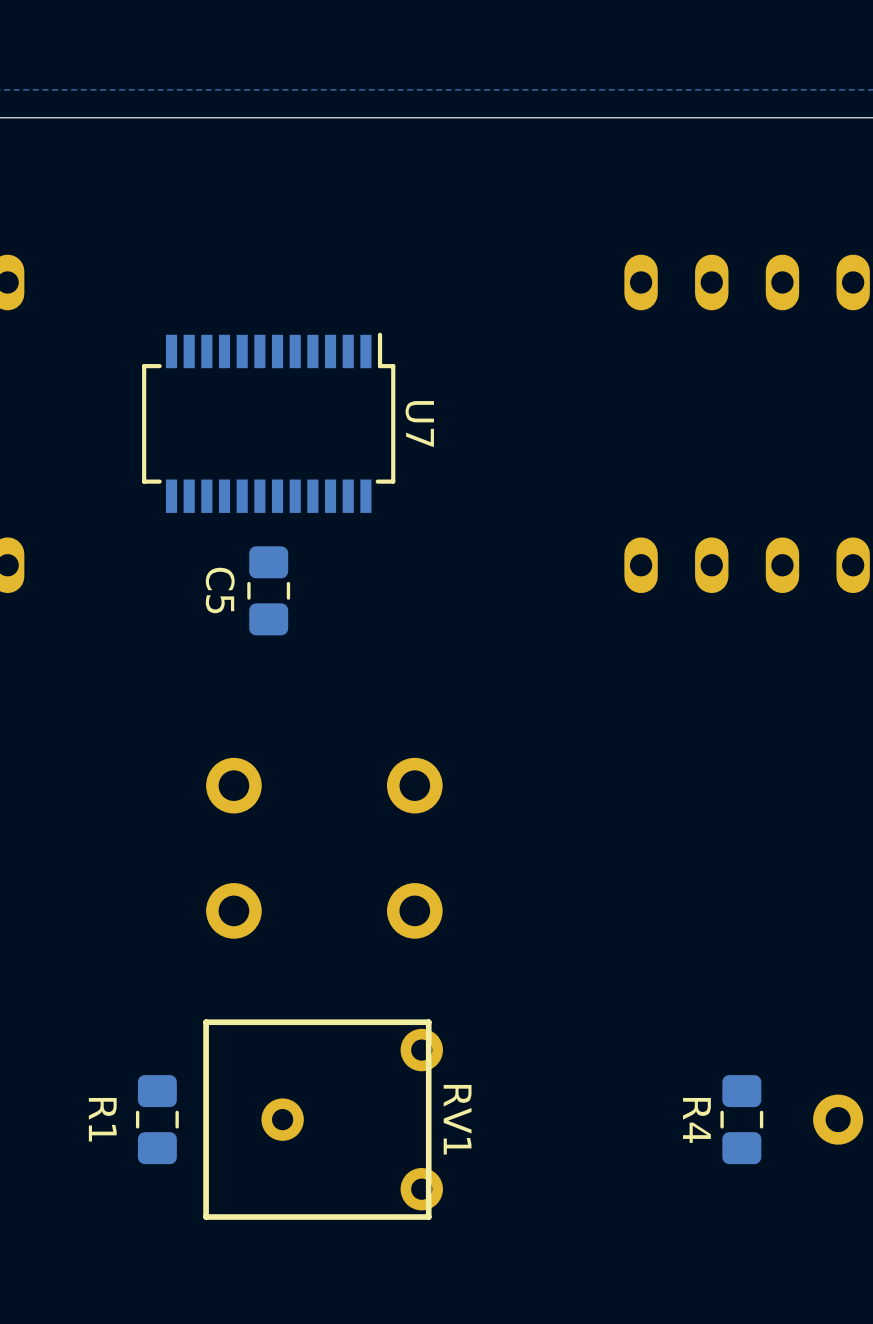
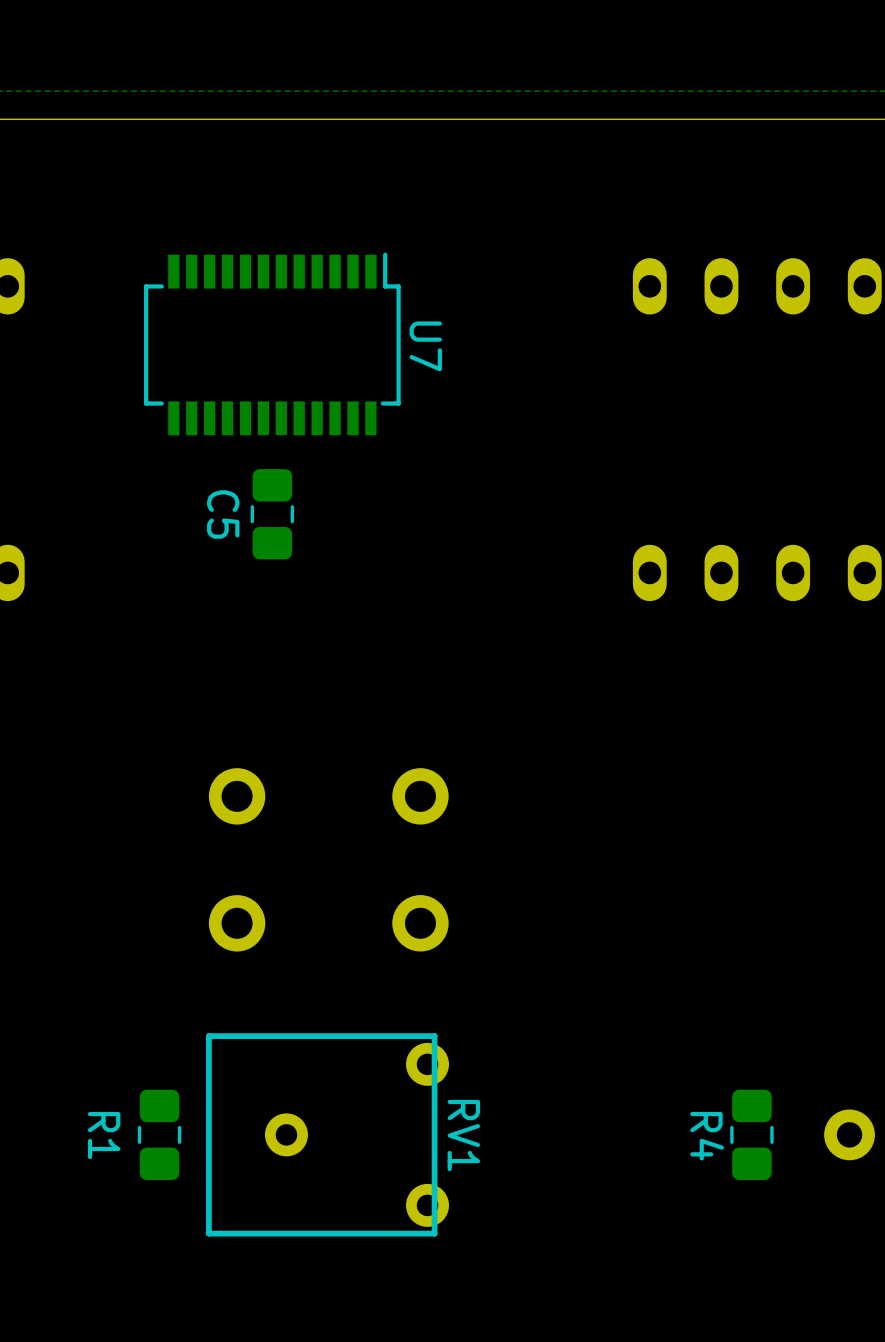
U7 position: (268, 422) -> (272, 343)
C5 position: (268, 590) -> (272, 514)

